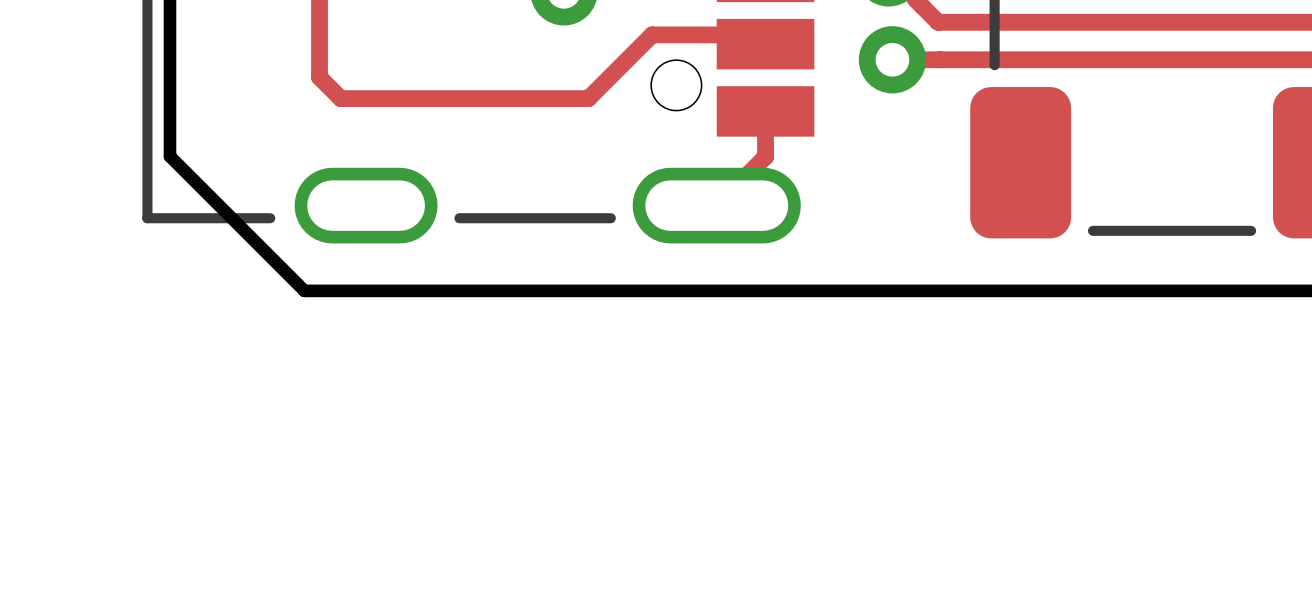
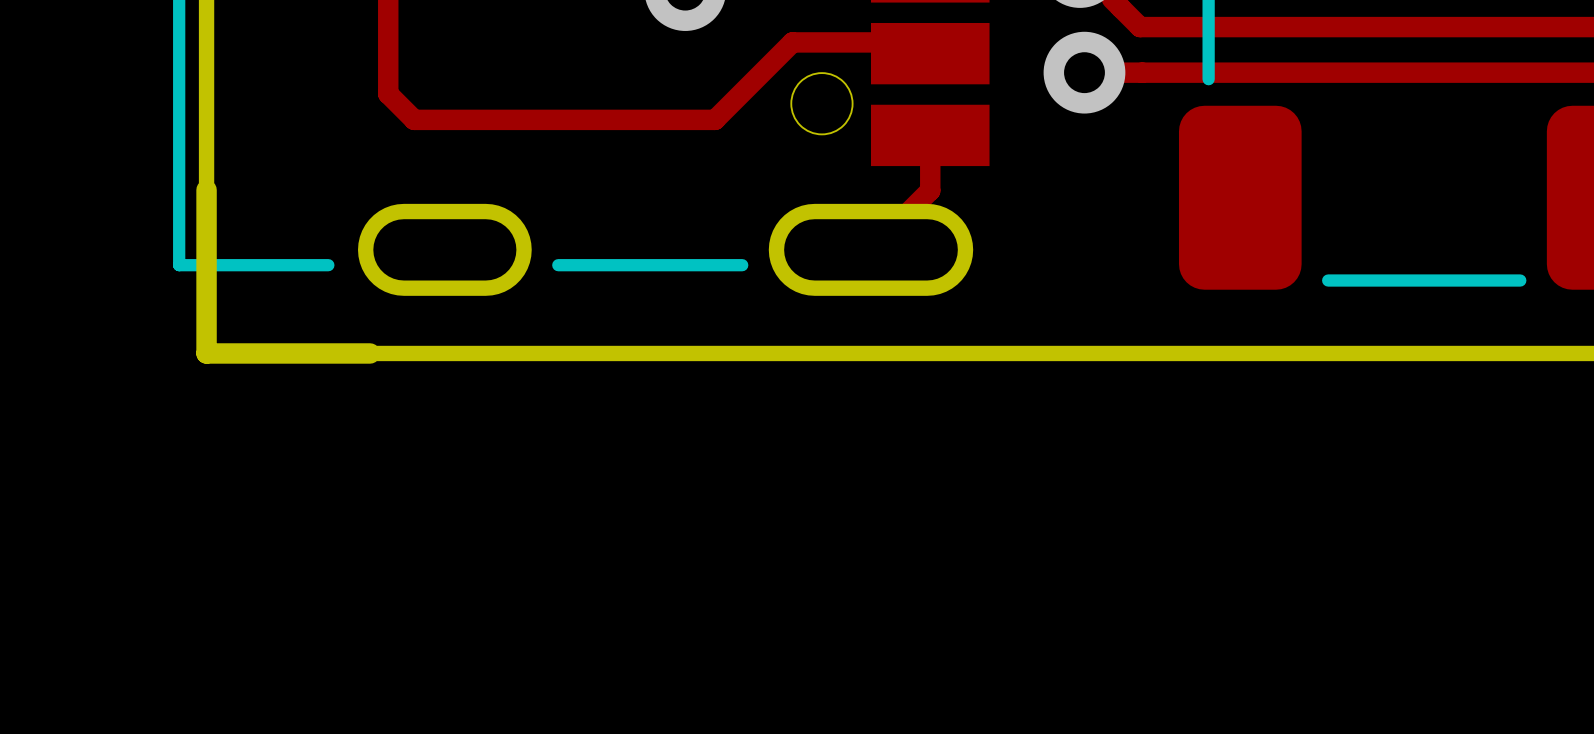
board edge: (169, 156) (304, 290) -> (206, 189) (206, 353) (370, 353)

